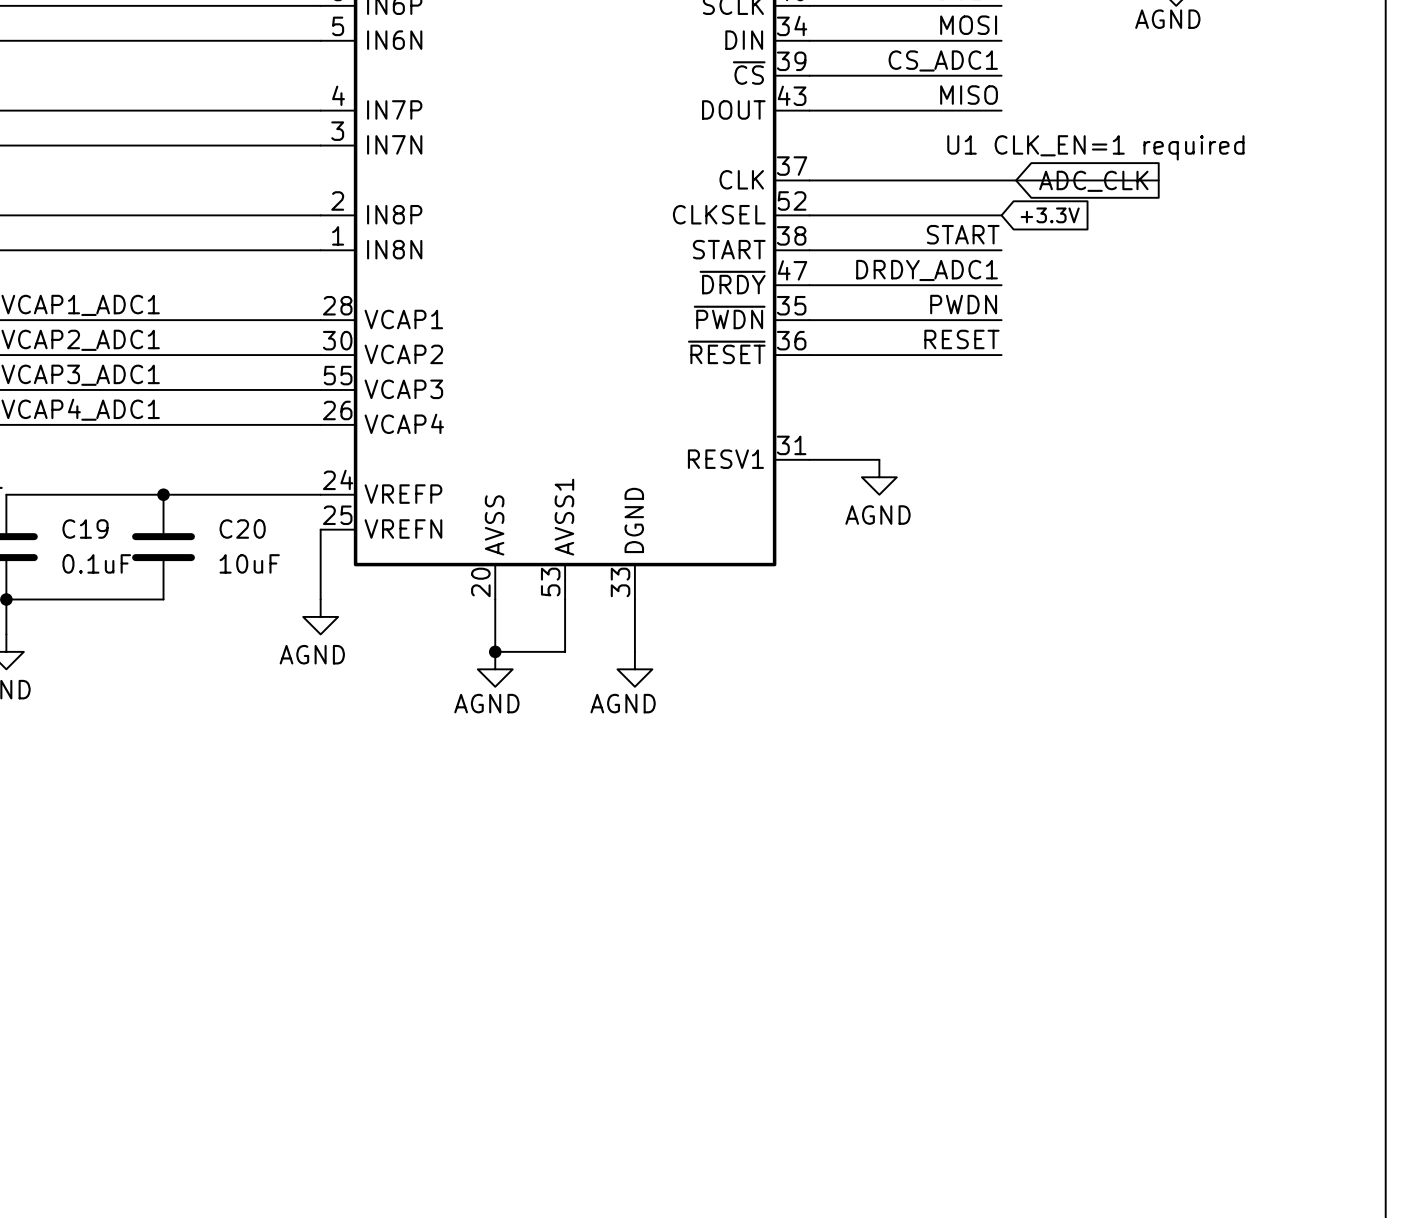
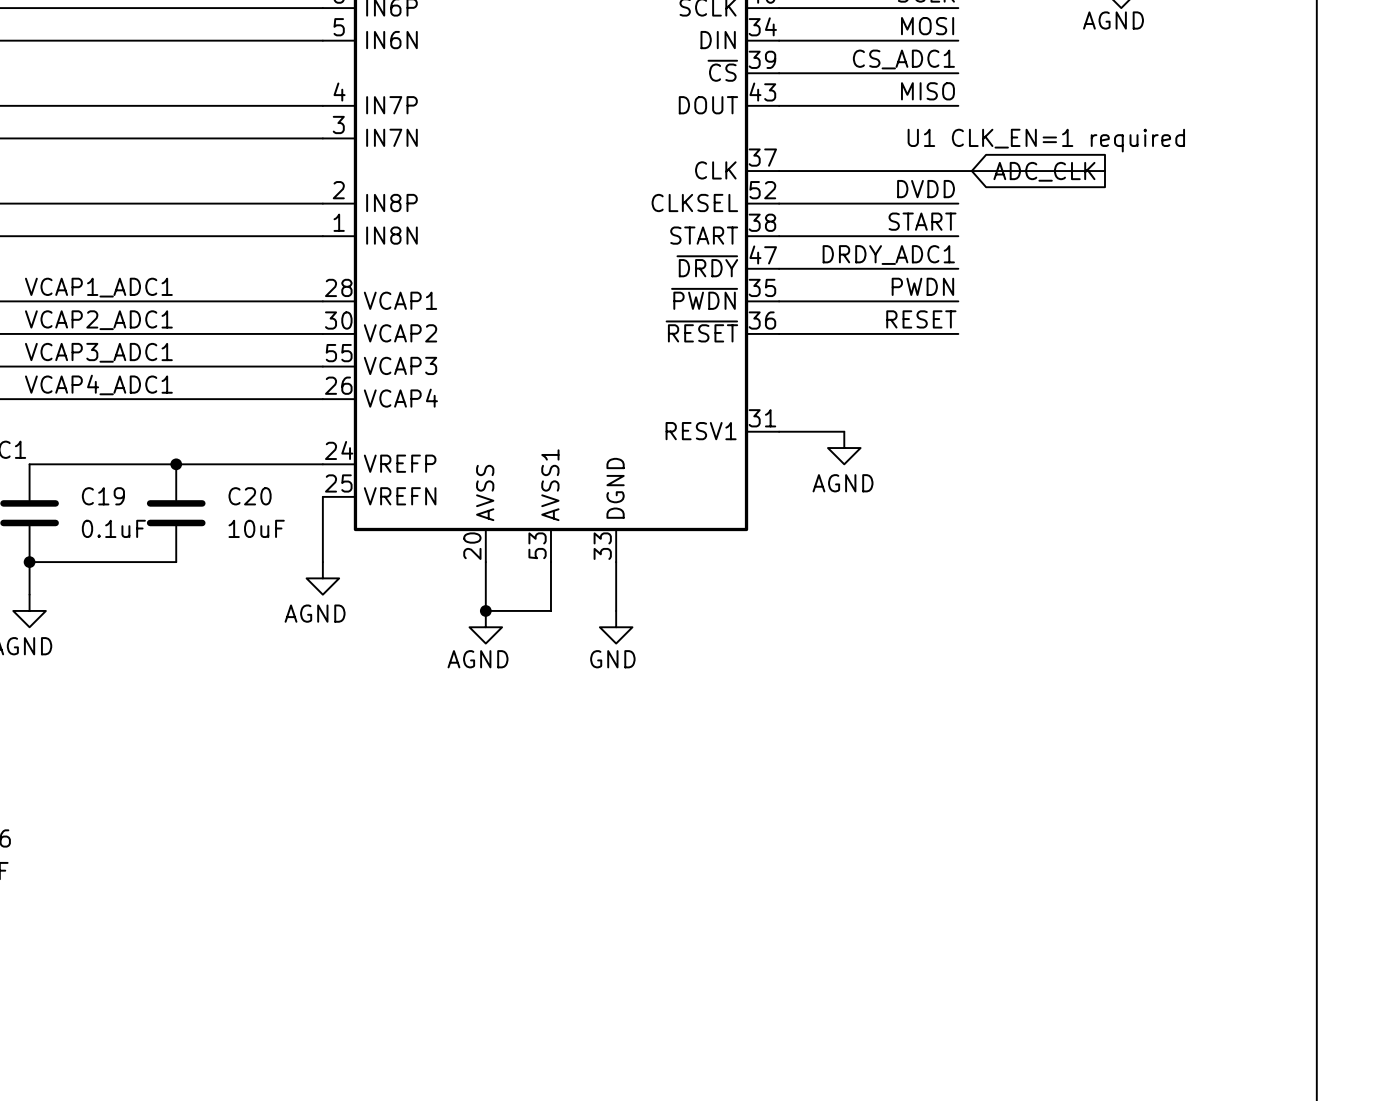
label: none -> DVDD (926, 189)
global label: +3.3V (1050, 215) -> none
power symbol: AGND (634, 669) -> GND (616, 627)

